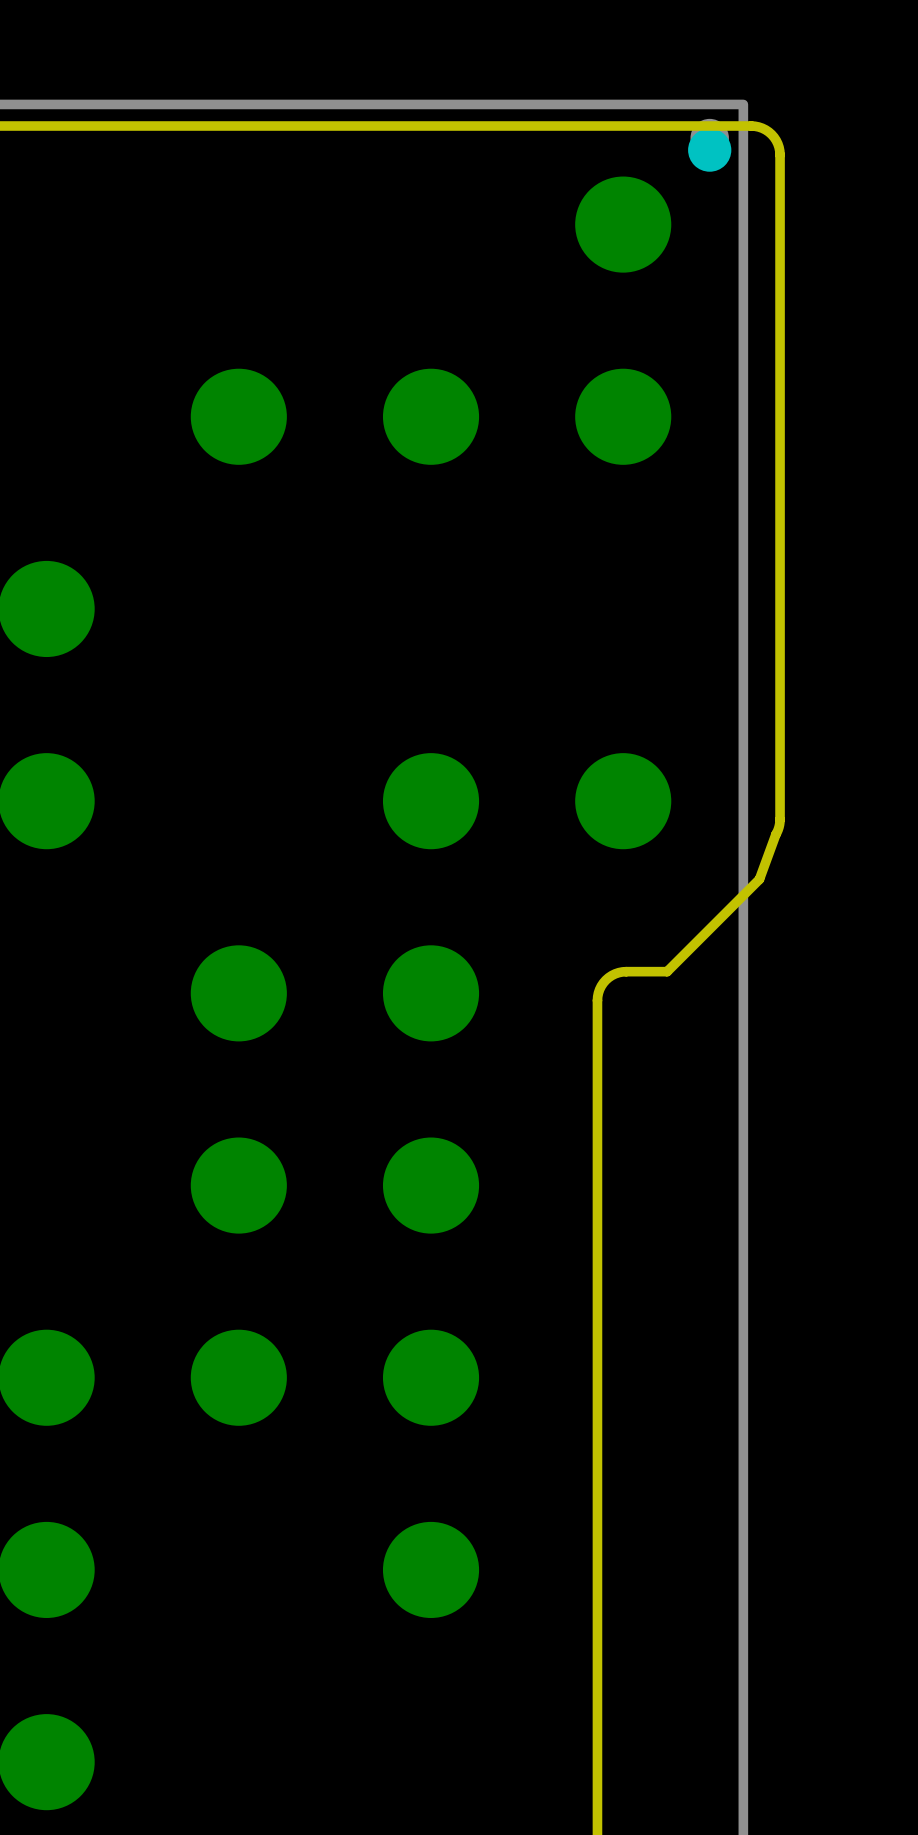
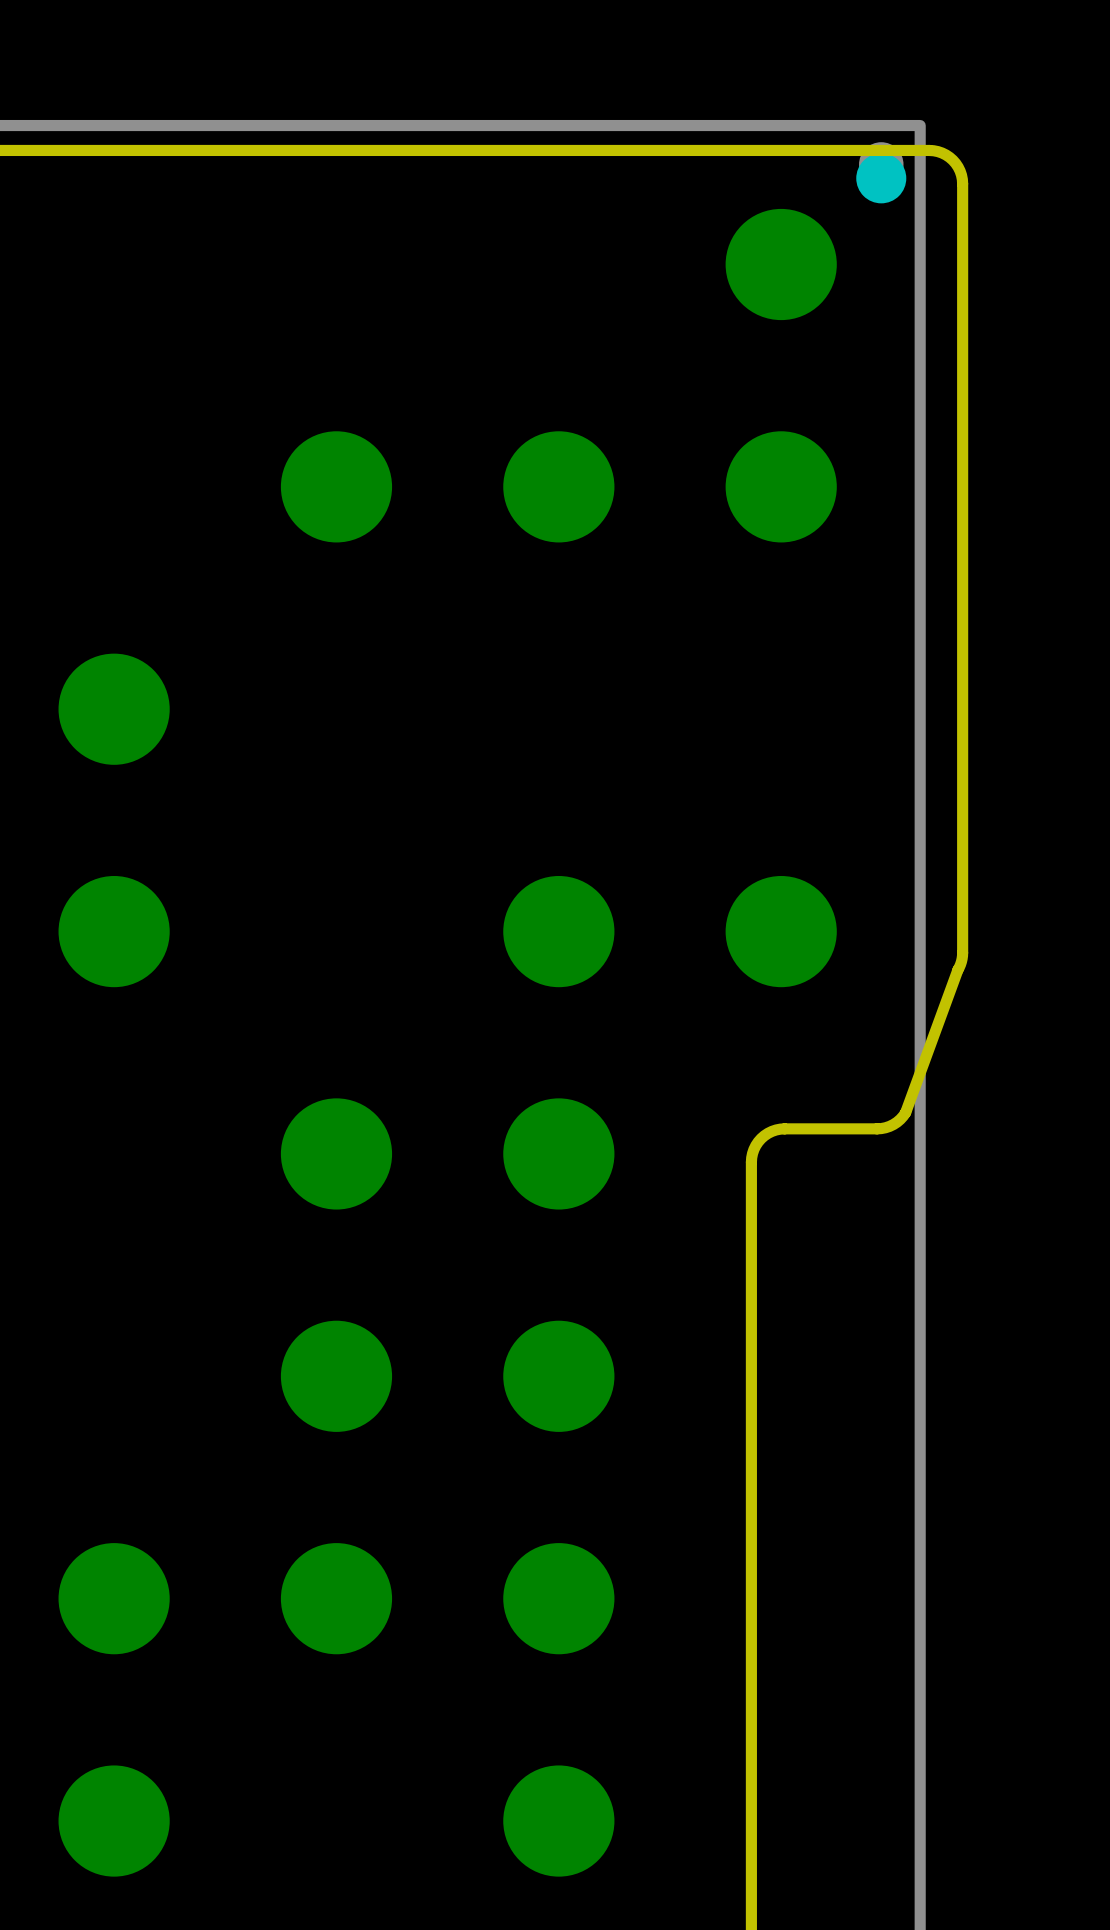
board edge: (775, 834) (759, 879) (667, 971) -> (957, 970) (903, 1116) (893, 1124) (881, 1128) (832, 1128)

